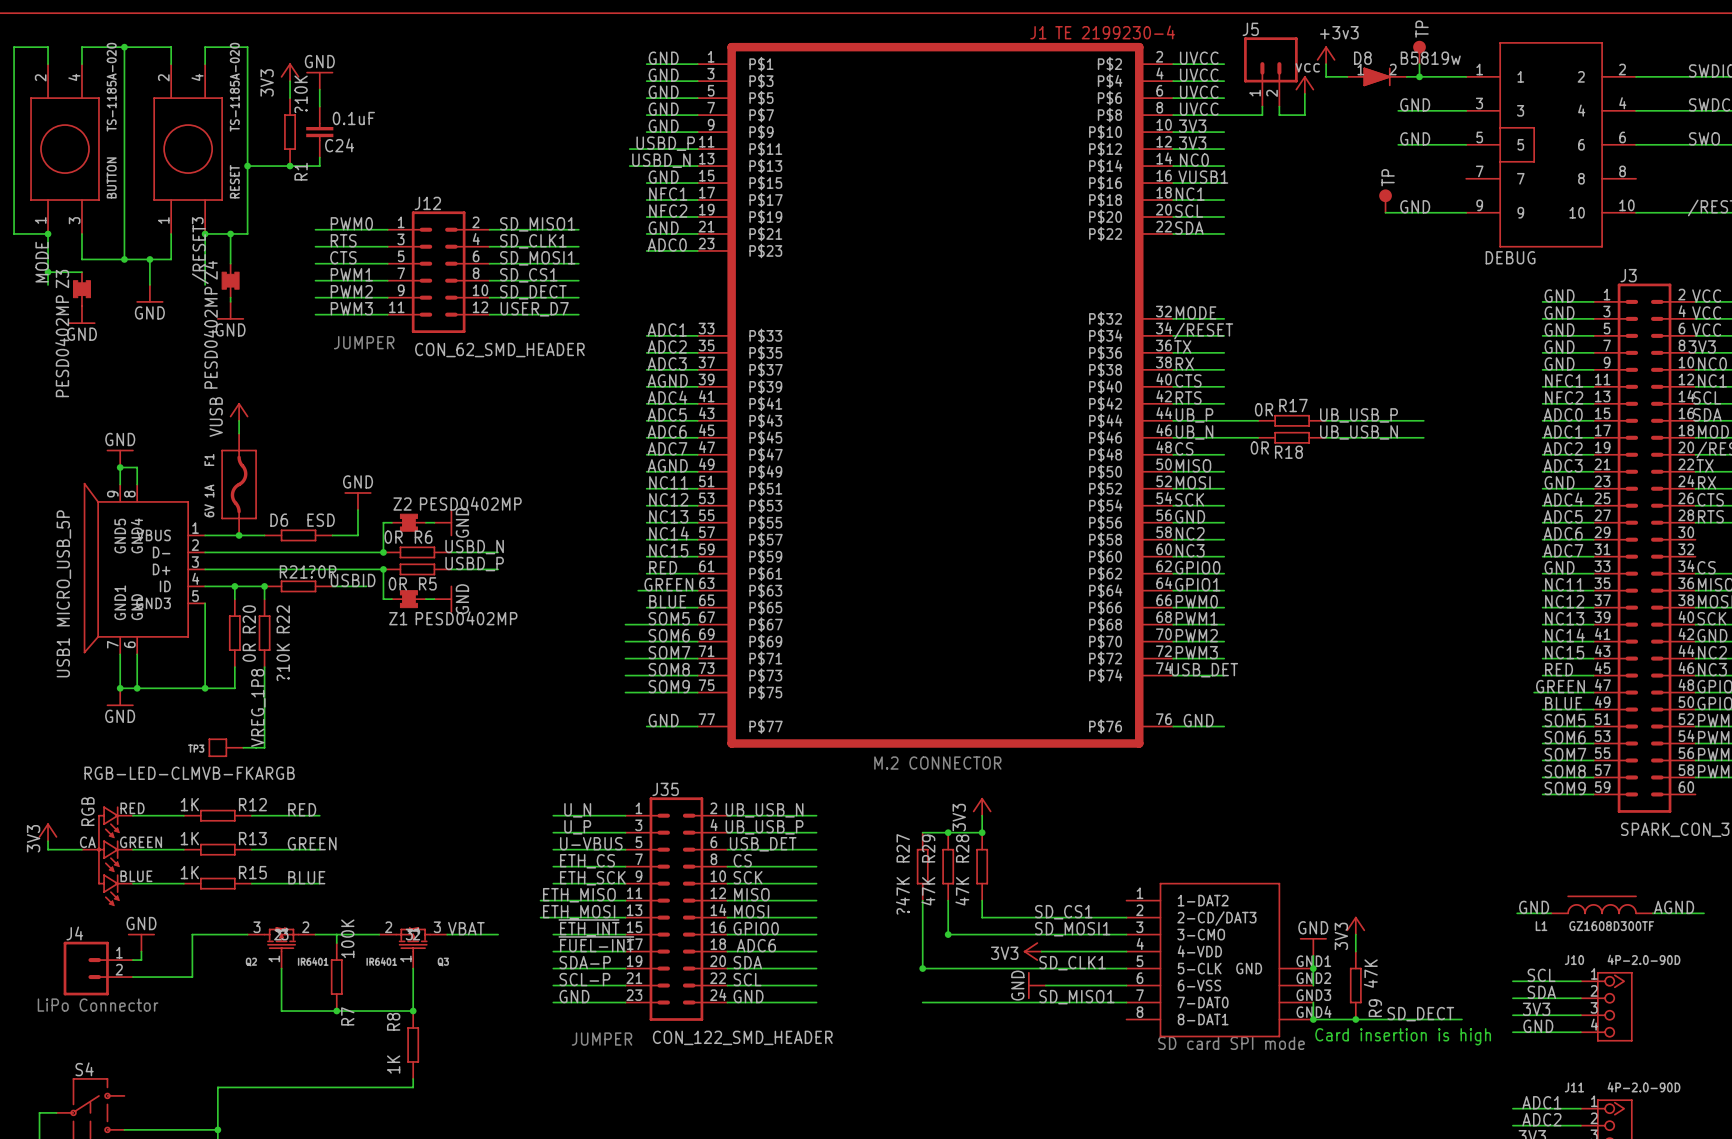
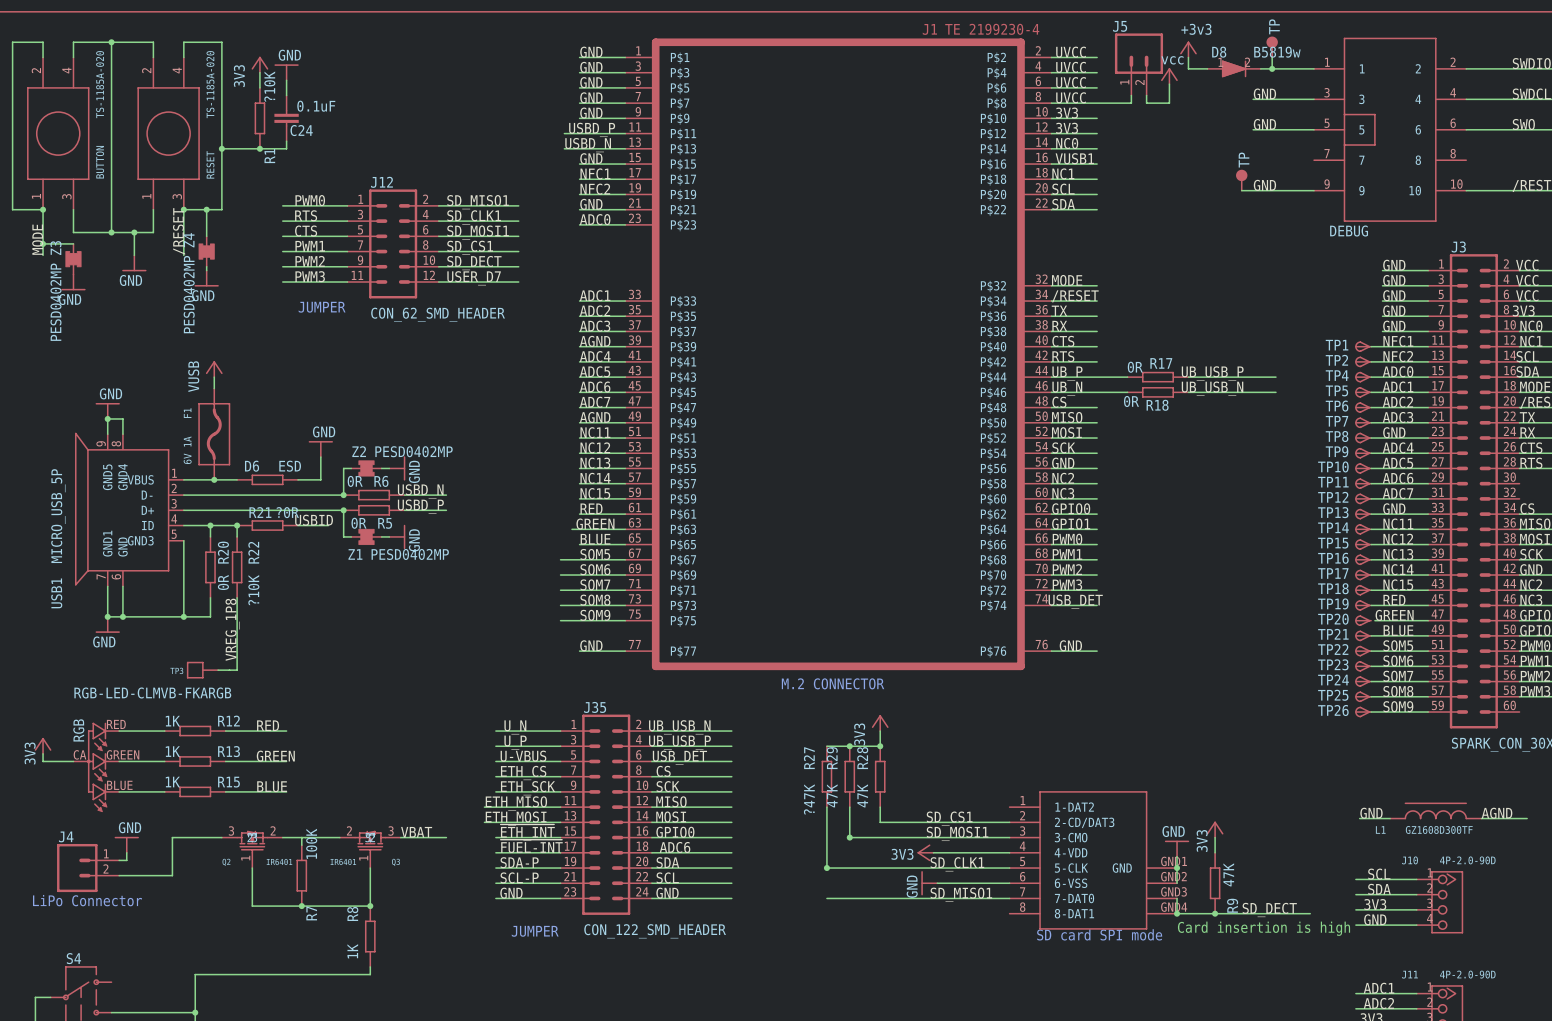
TP1: none -> (1363, 346)
wire: none -> (1371, 346) (1382, 346)
TP2: none -> (1363, 361)
wire: none -> (1371, 361) (1382, 361)
TP4: none -> (1363, 377)
wire: none -> (1371, 377) (1382, 377)
TP5: none -> (1363, 392)
wire: none -> (1371, 392) (1382, 392)
TP6: none -> (1363, 407)
wire: none -> (1371, 407) (1382, 407)
TP7: none -> (1363, 422)
wire: none -> (1371, 422) (1382, 422)
TP8: none -> (1363, 438)
wire: none -> (1371, 438) (1382, 438)
TP9: none -> (1363, 453)
wire: none -> (1371, 453) (1382, 453)
TP10: none -> (1363, 468)
wire: none -> (1371, 468) (1382, 468)
TP11: none -> (1363, 483)
wire: none -> (1371, 483) (1382, 483)
TP12: none -> (1363, 498)
wire: none -> (1371, 498) (1382, 498)
TP13: none -> (1363, 514)
wire: none -> (1371, 514) (1382, 514)
TP14: none -> (1363, 529)
wire: none -> (1371, 529) (1382, 529)
TP15: none -> (1363, 544)
wire: none -> (1371, 544) (1382, 544)
TP16: none -> (1363, 559)
wire: none -> (1371, 559) (1382, 559)
TP17: none -> (1363, 575)
wire: none -> (1371, 575) (1382, 575)
TP18: none -> (1363, 590)
wire: none -> (1371, 590) (1382, 590)
TP19: none -> (1363, 605)
wire: none -> (1371, 605) (1382, 605)
TP20: none -> (1363, 620)
TP21: none -> (1363, 635)
wire: none -> (1371, 635) (1382, 635)
TP22: none -> (1363, 651)
wire: none -> (1371, 651) (1382, 651)
TP23: none -> (1363, 666)
wire: none -> (1371, 666) (1382, 666)
TP24: none -> (1363, 681)
wire: none -> (1371, 681) (1382, 681)
TP25: none -> (1363, 696)
wire: none -> (1371, 696) (1382, 696)
TP26: none -> (1363, 712)
wire: none -> (1371, 712) (1382, 712)

